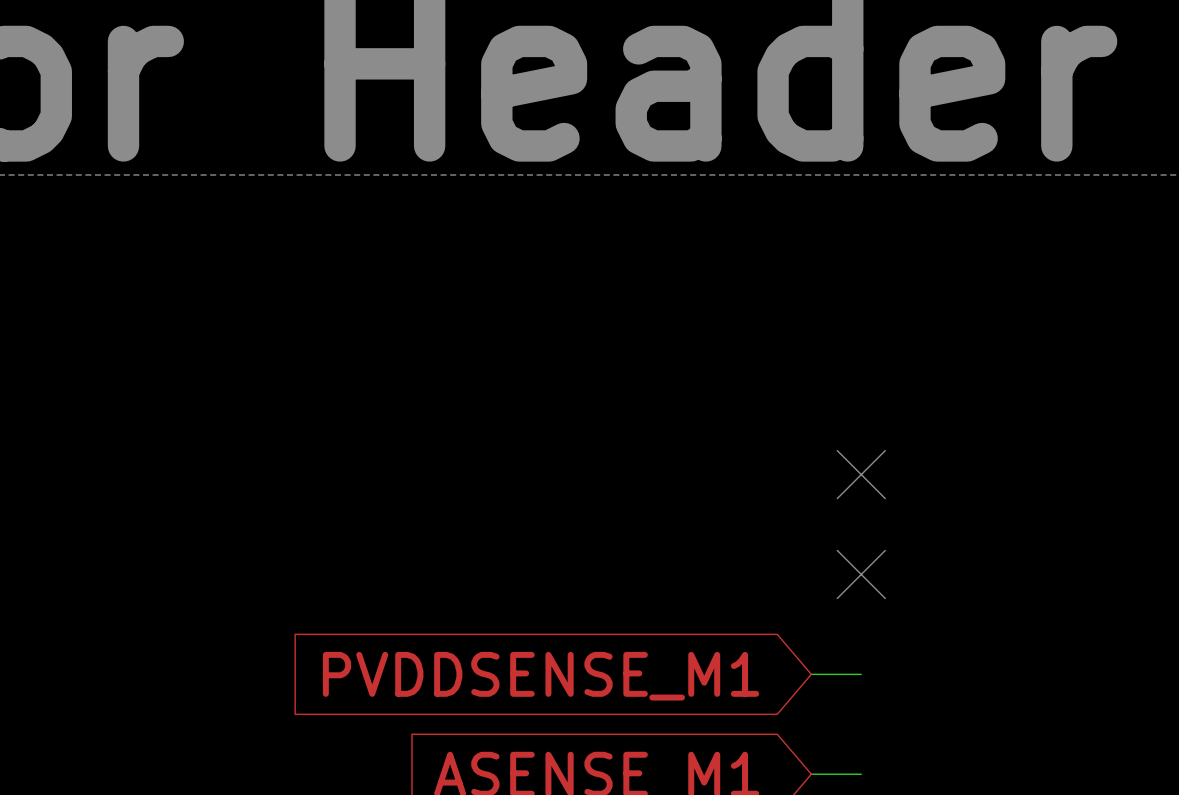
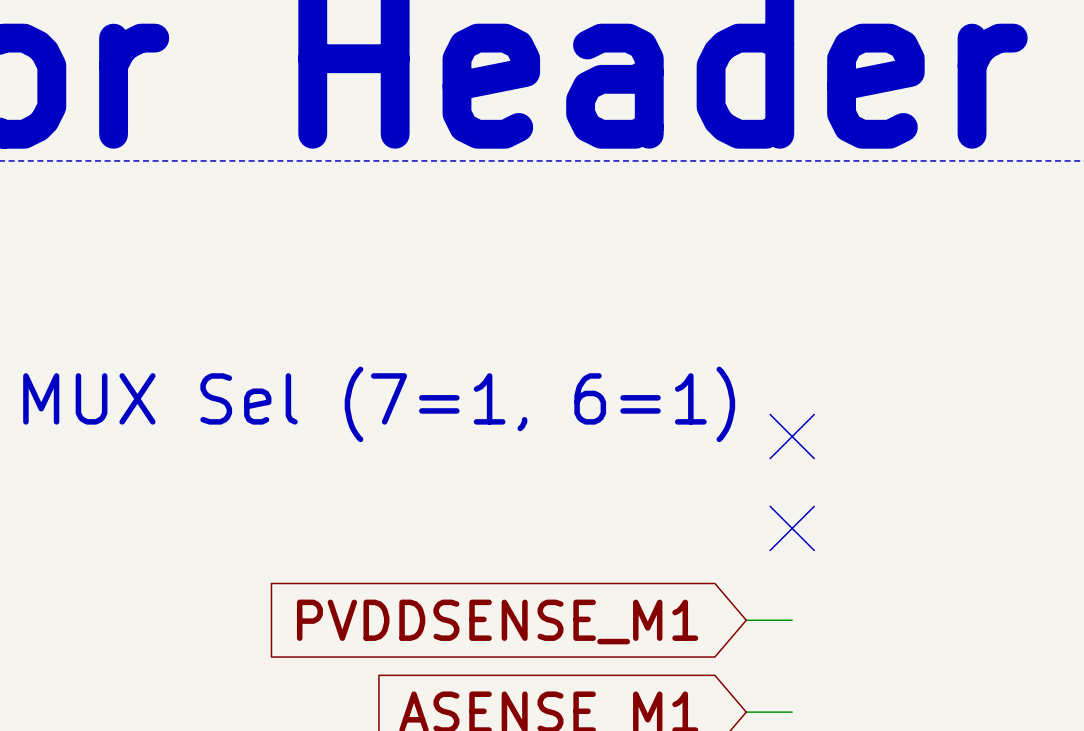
text: none -> MUX Sel (7=1, 6=1) (379, 404)

